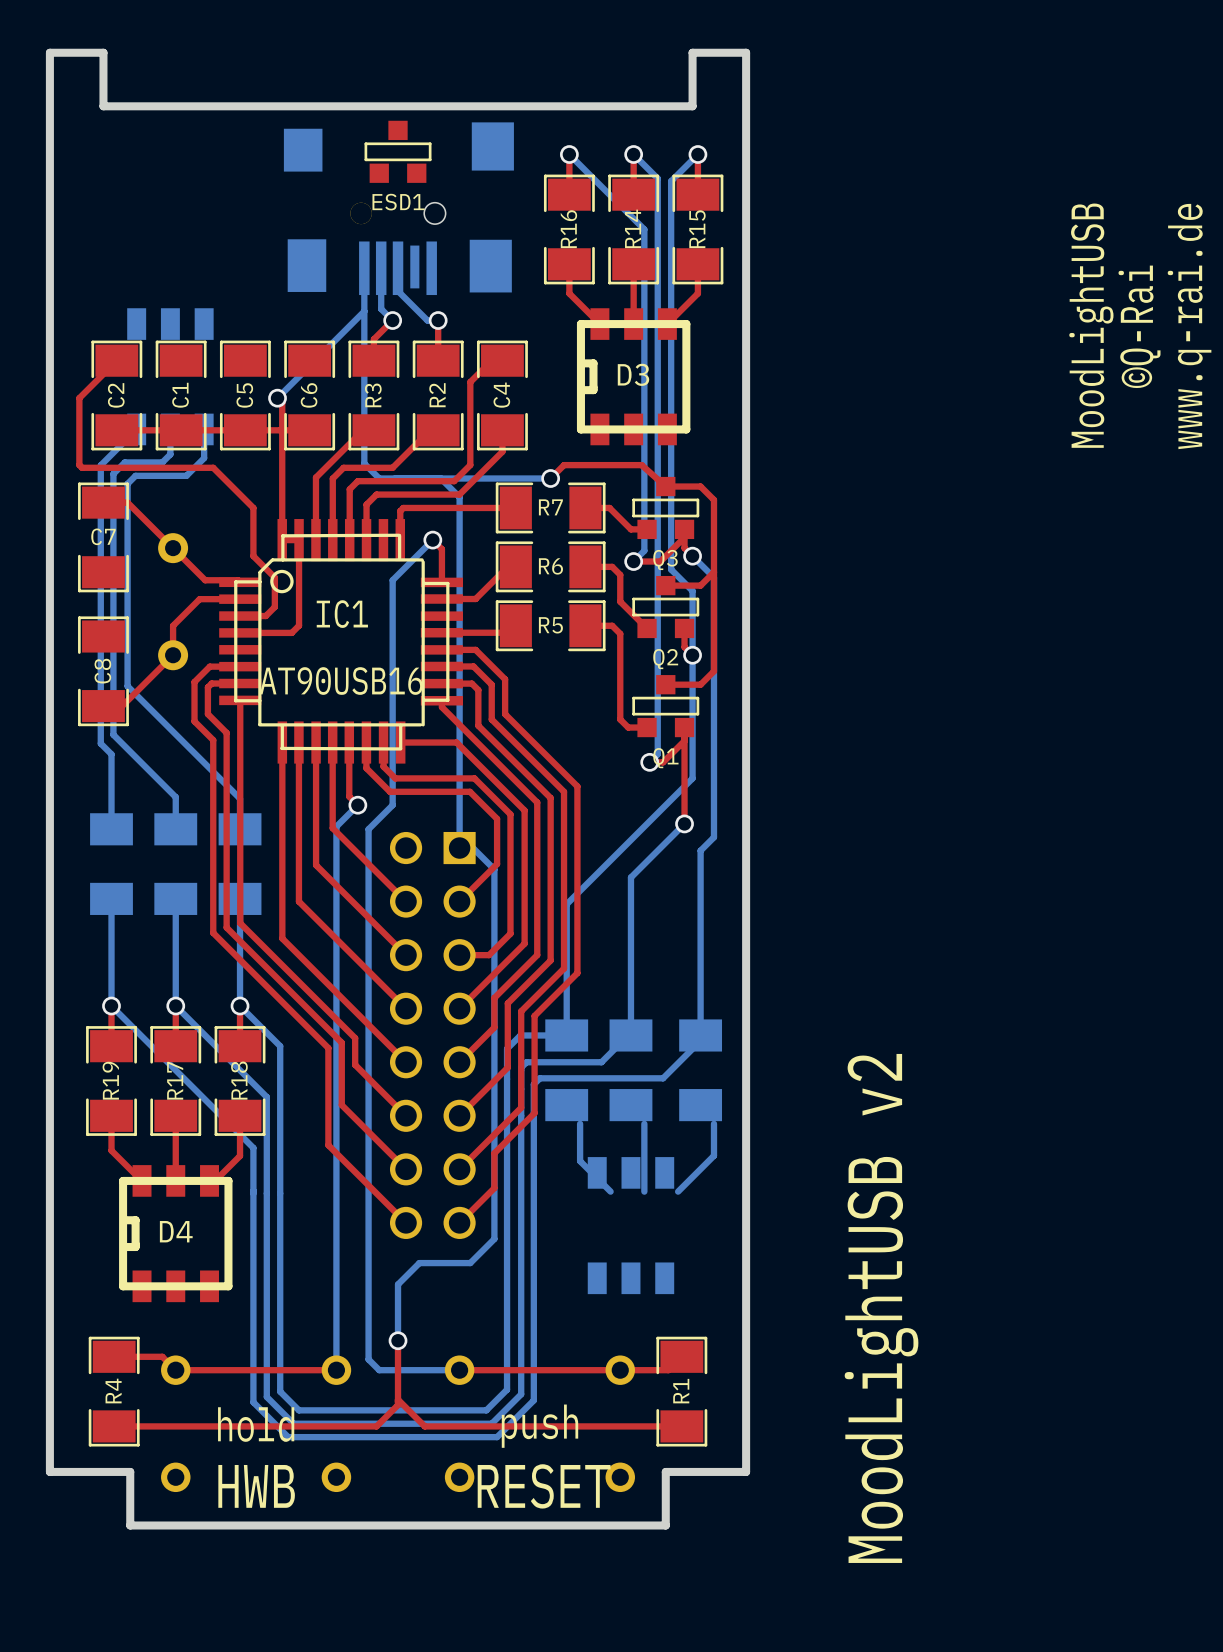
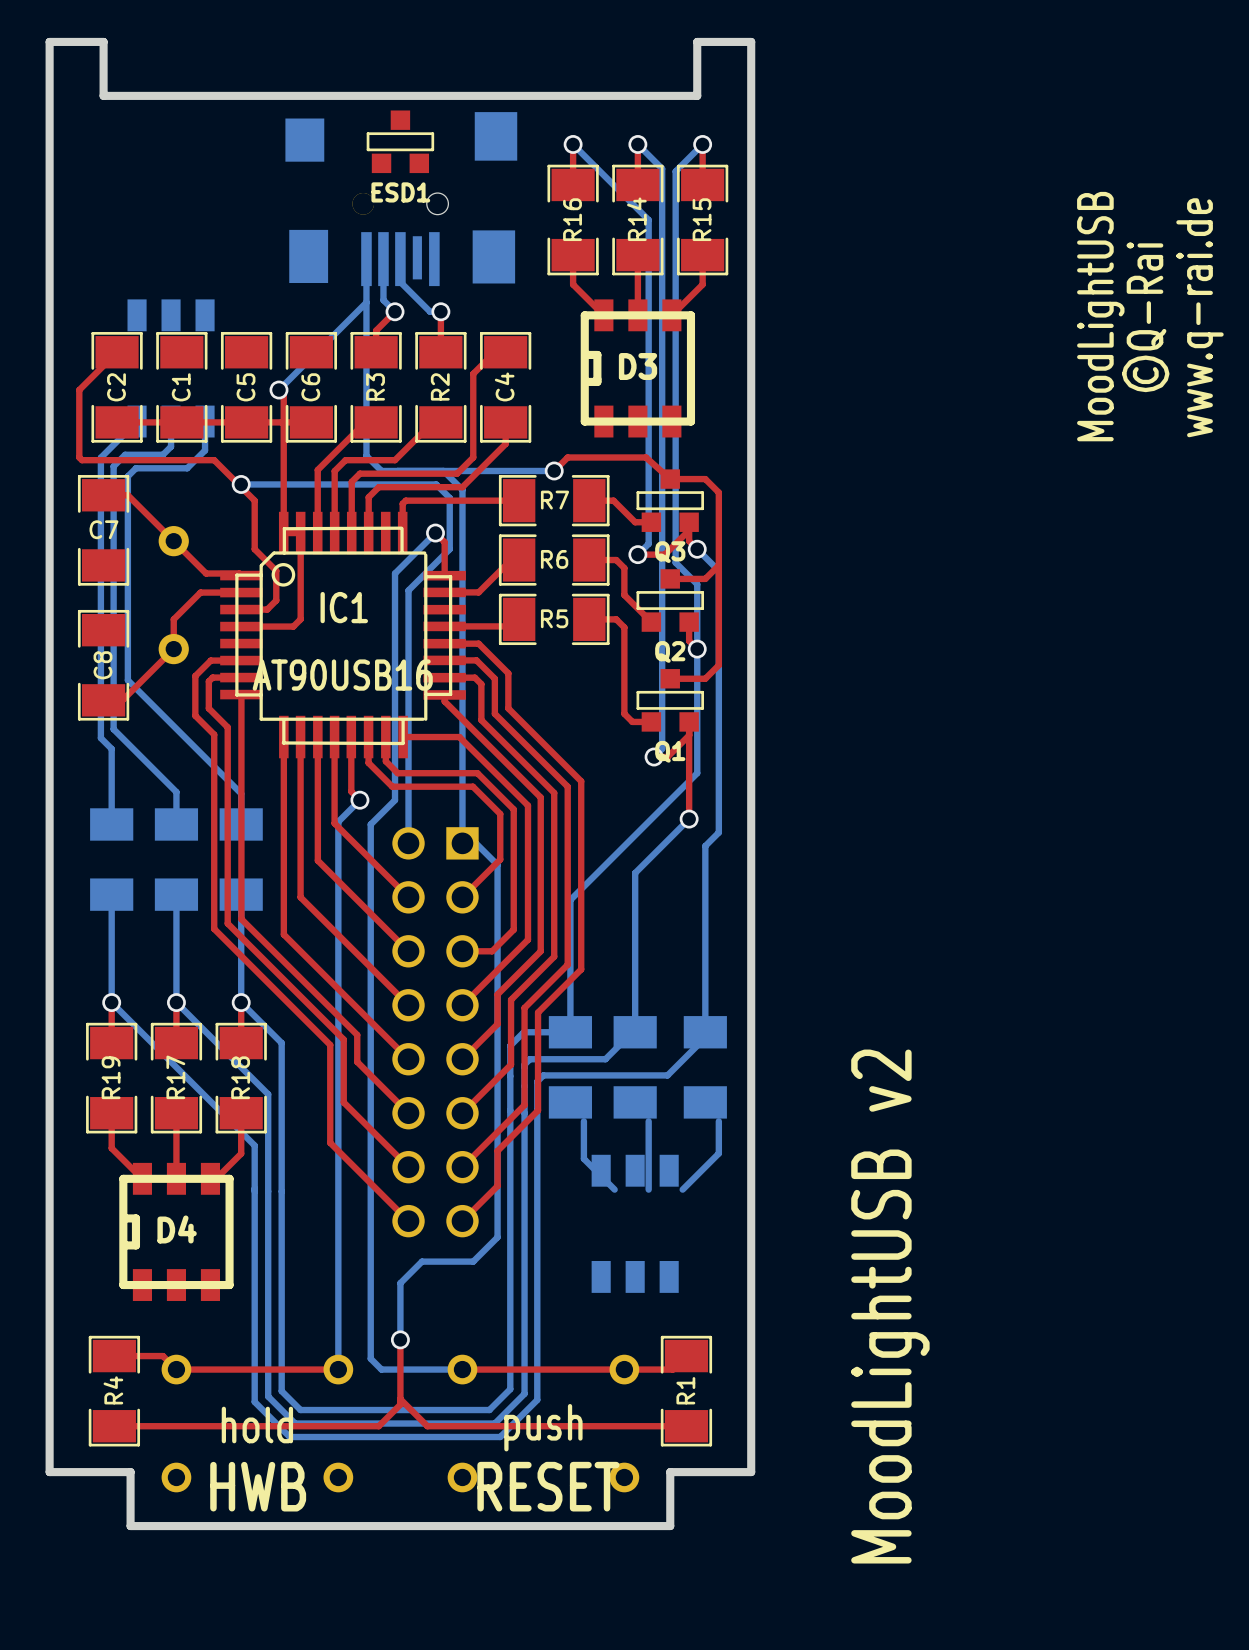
bottom track: none -> (241, 484) (436, 484) (449, 497) (449, 549) (408, 590) (408, 843)
via: none -> (241, 484)

